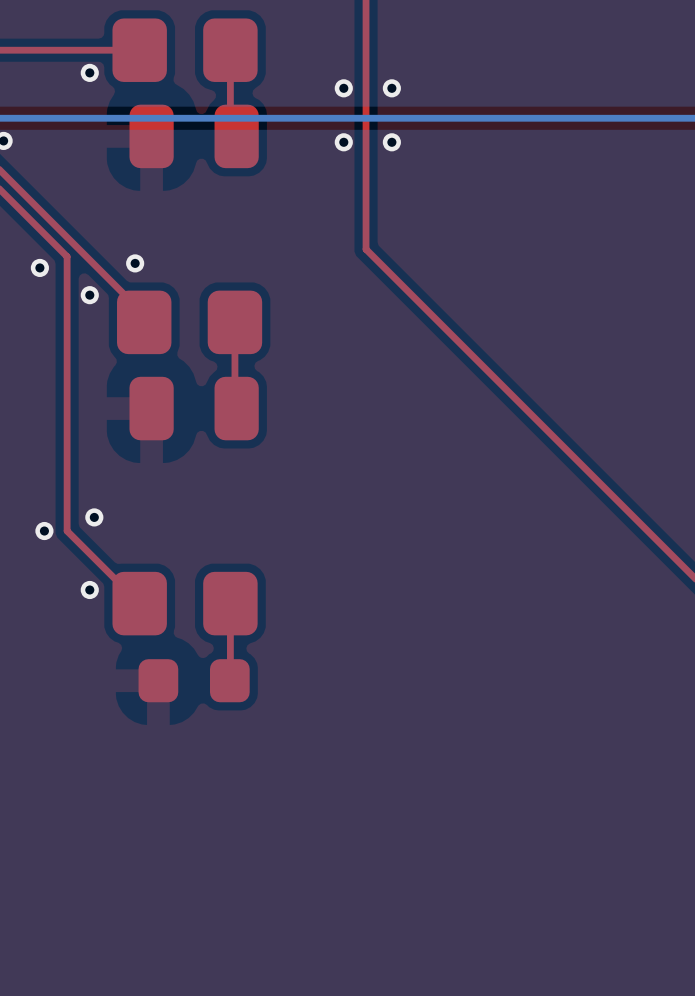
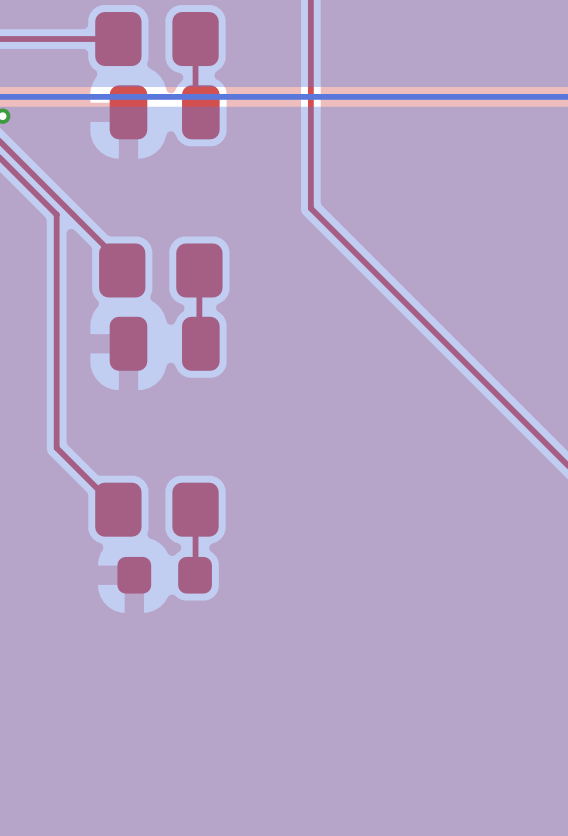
via: (89, 72) -> none
via: (343, 88) -> none
via: (391, 88) -> none
via: (343, 142) -> none
via: (391, 142) -> none
via: (135, 263) -> none
via: (39, 267) -> none
via: (89, 295) -> none
via: (94, 517) -> none
via: (44, 531) -> none
via: (89, 589) -> none

